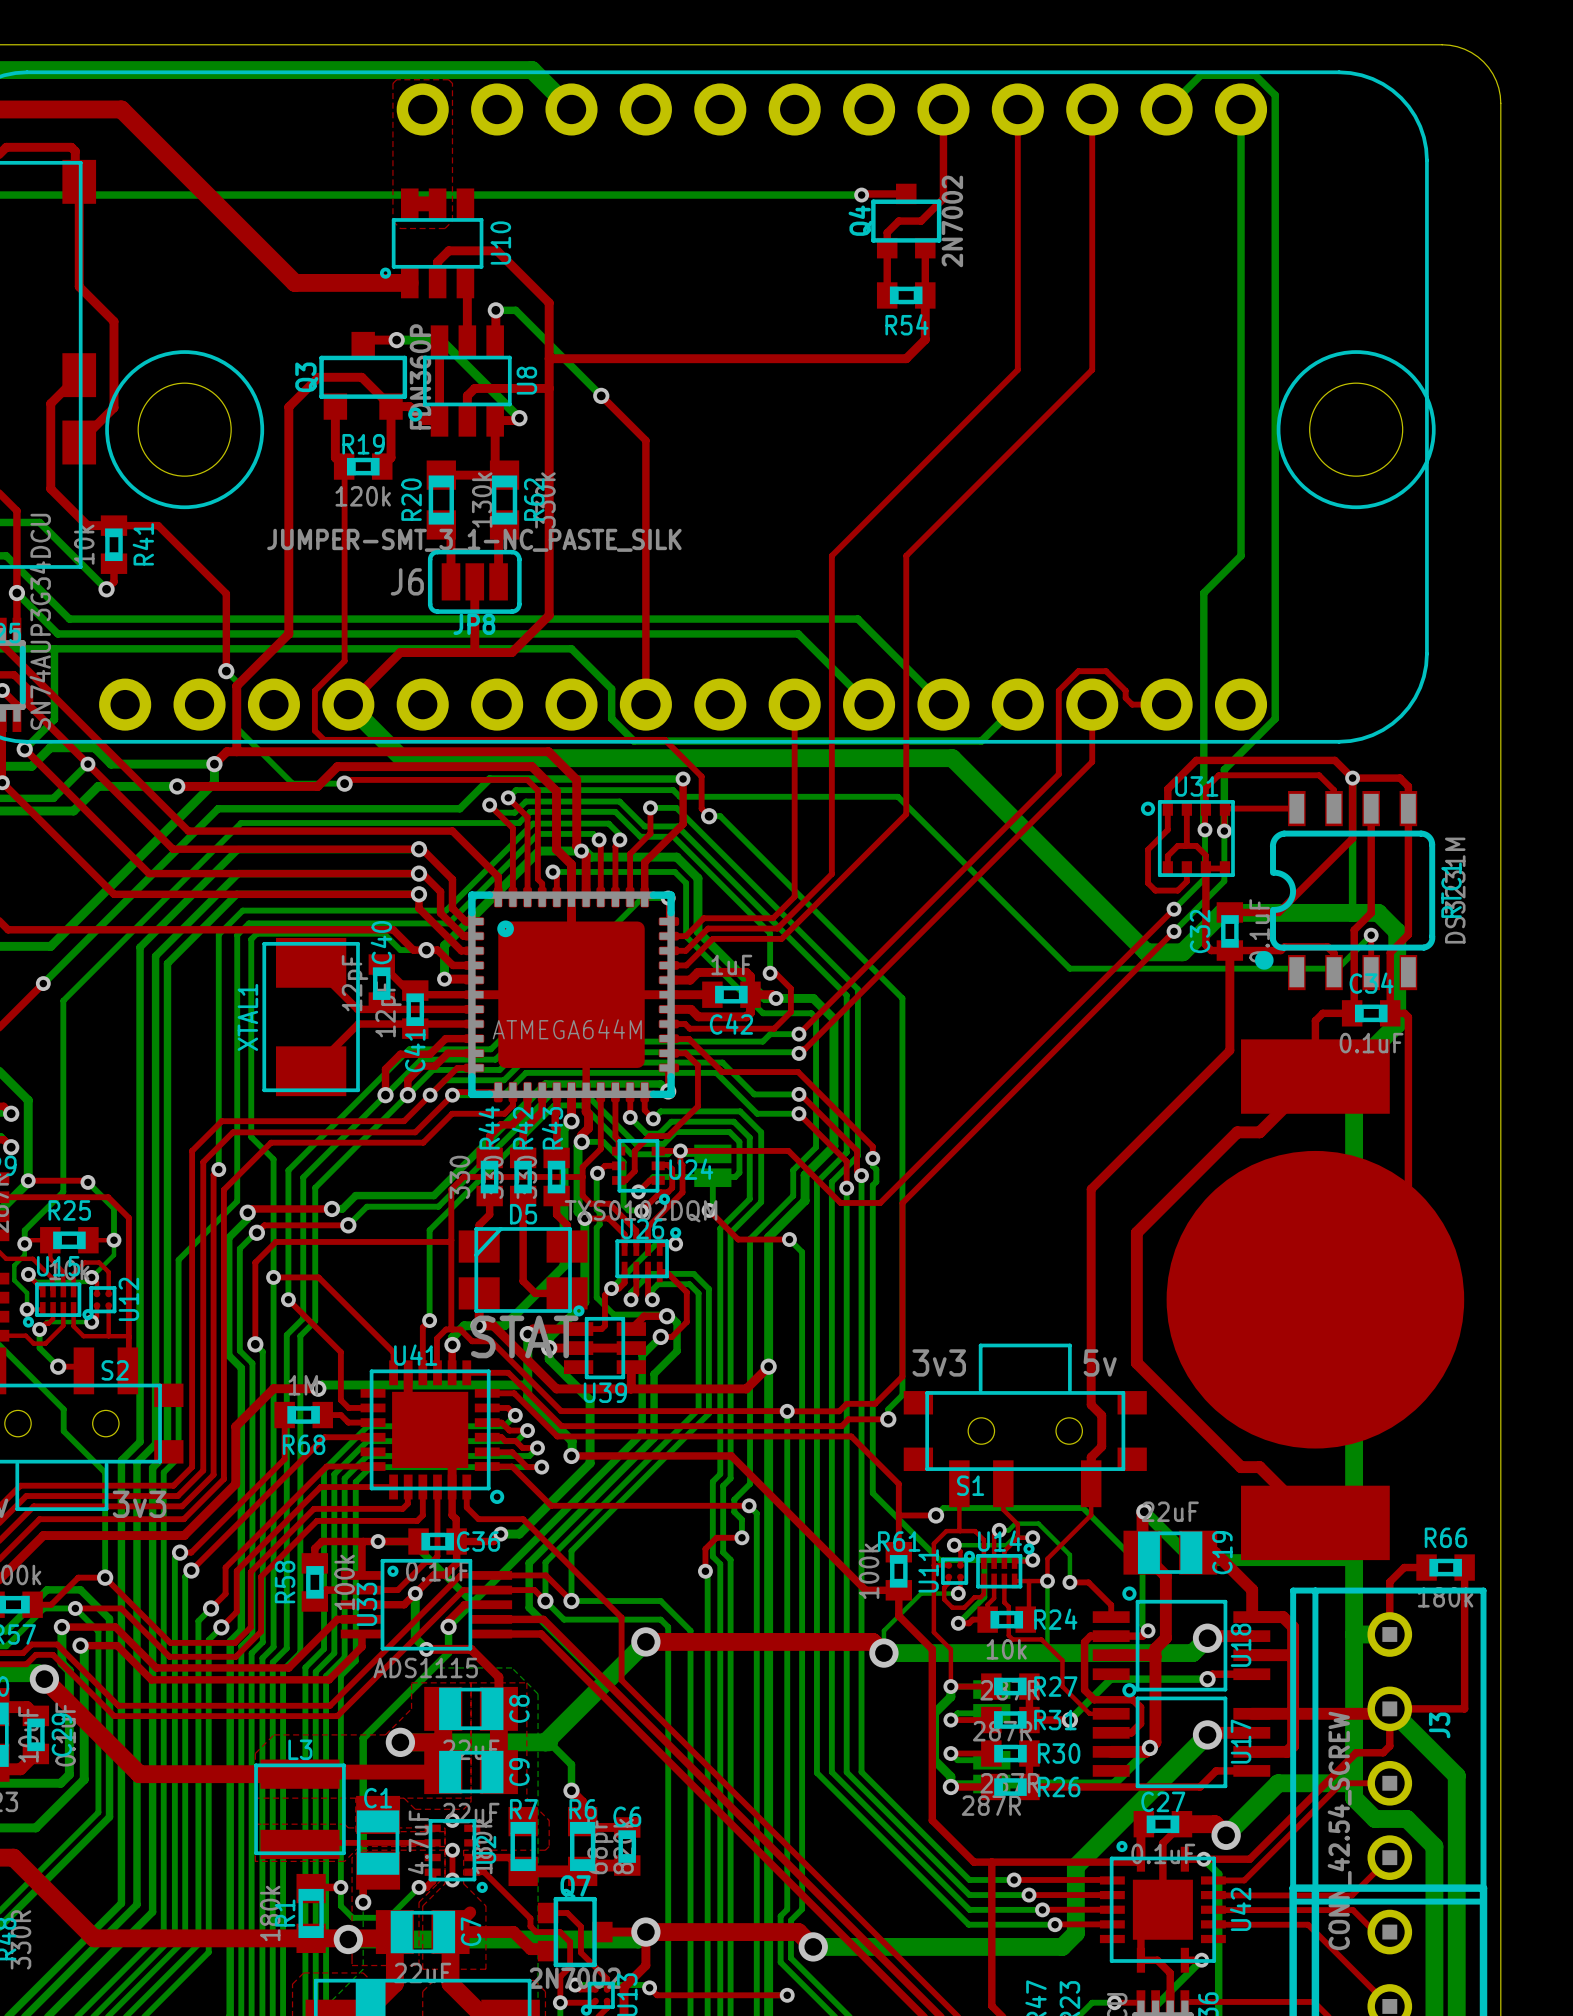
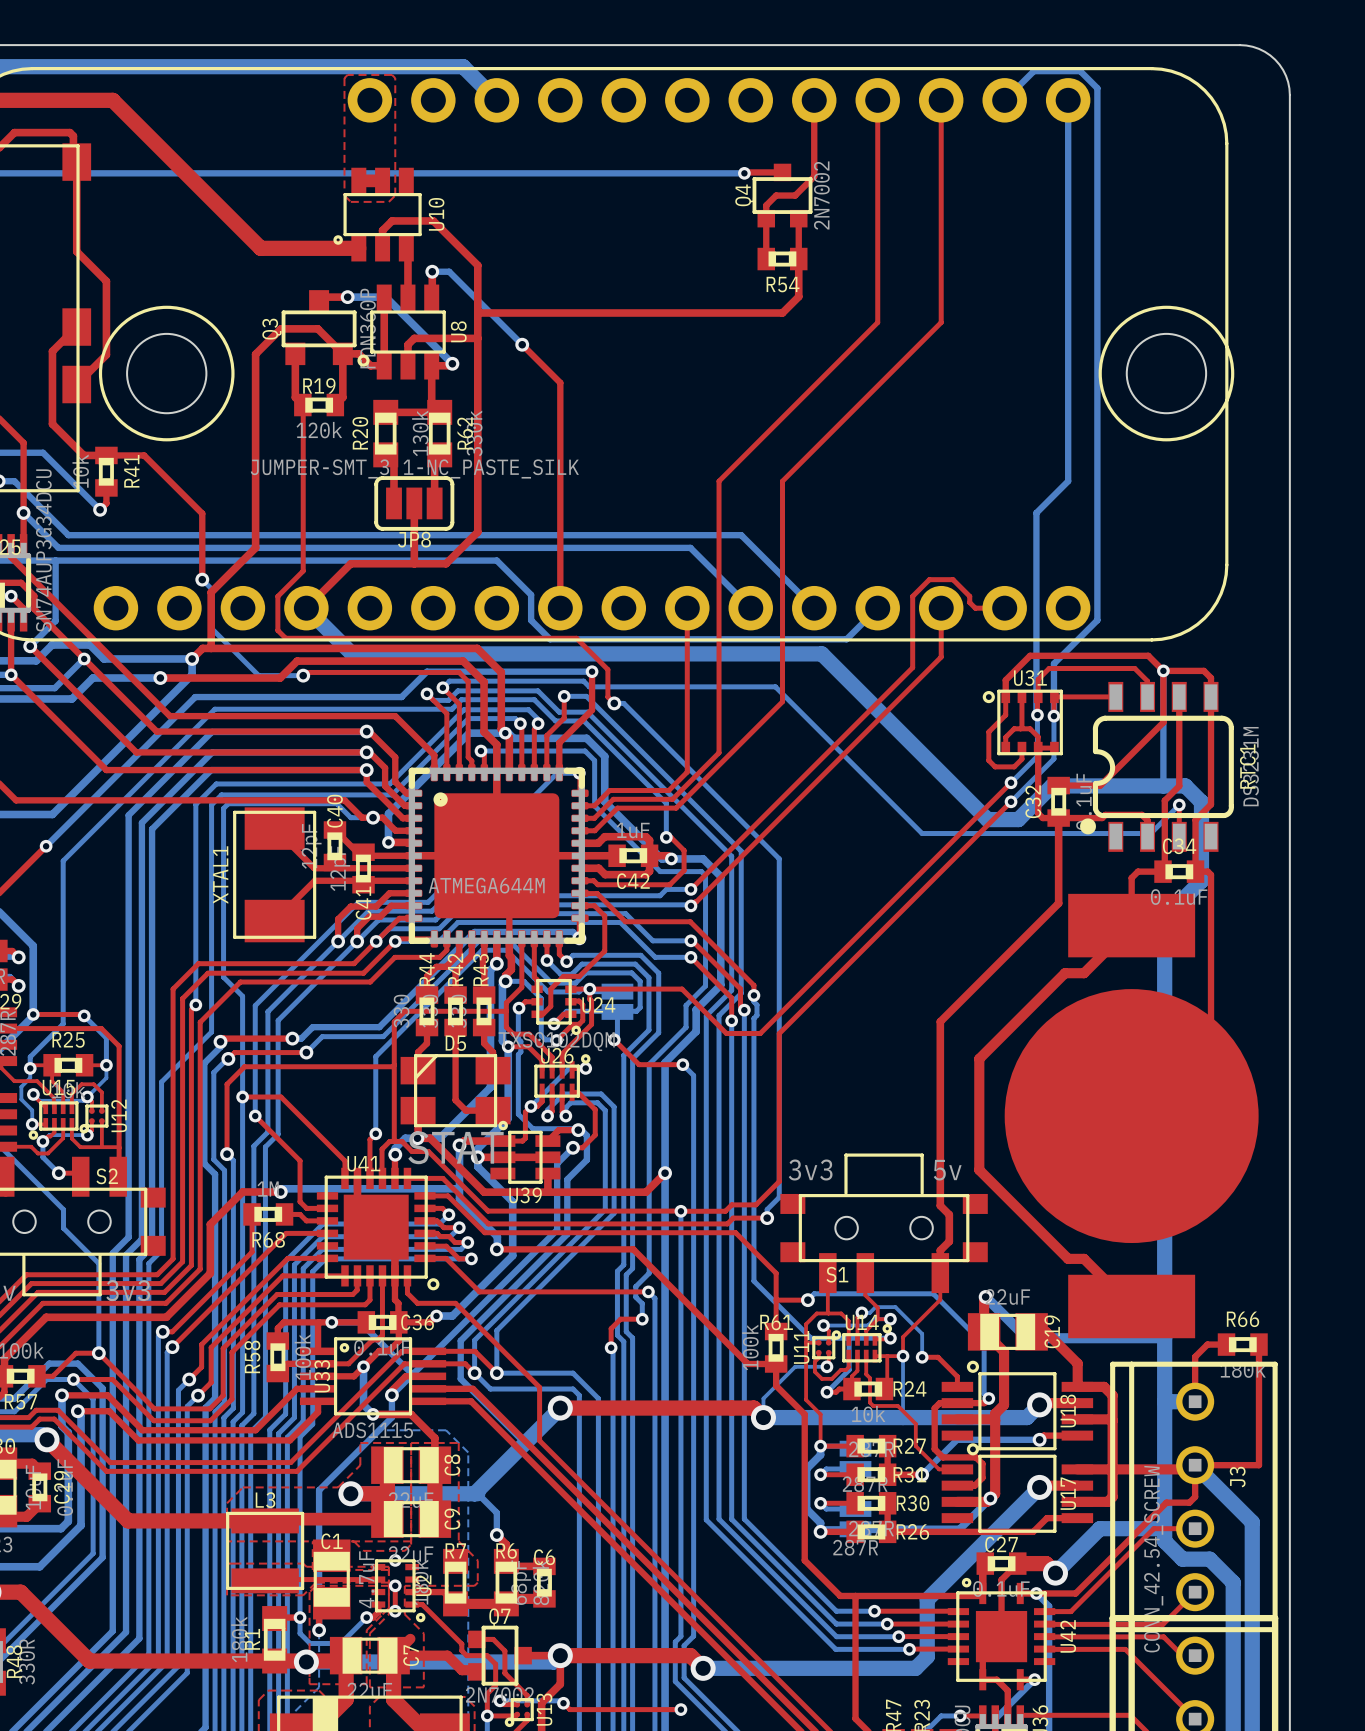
text: J6 (407, 581) -> none

